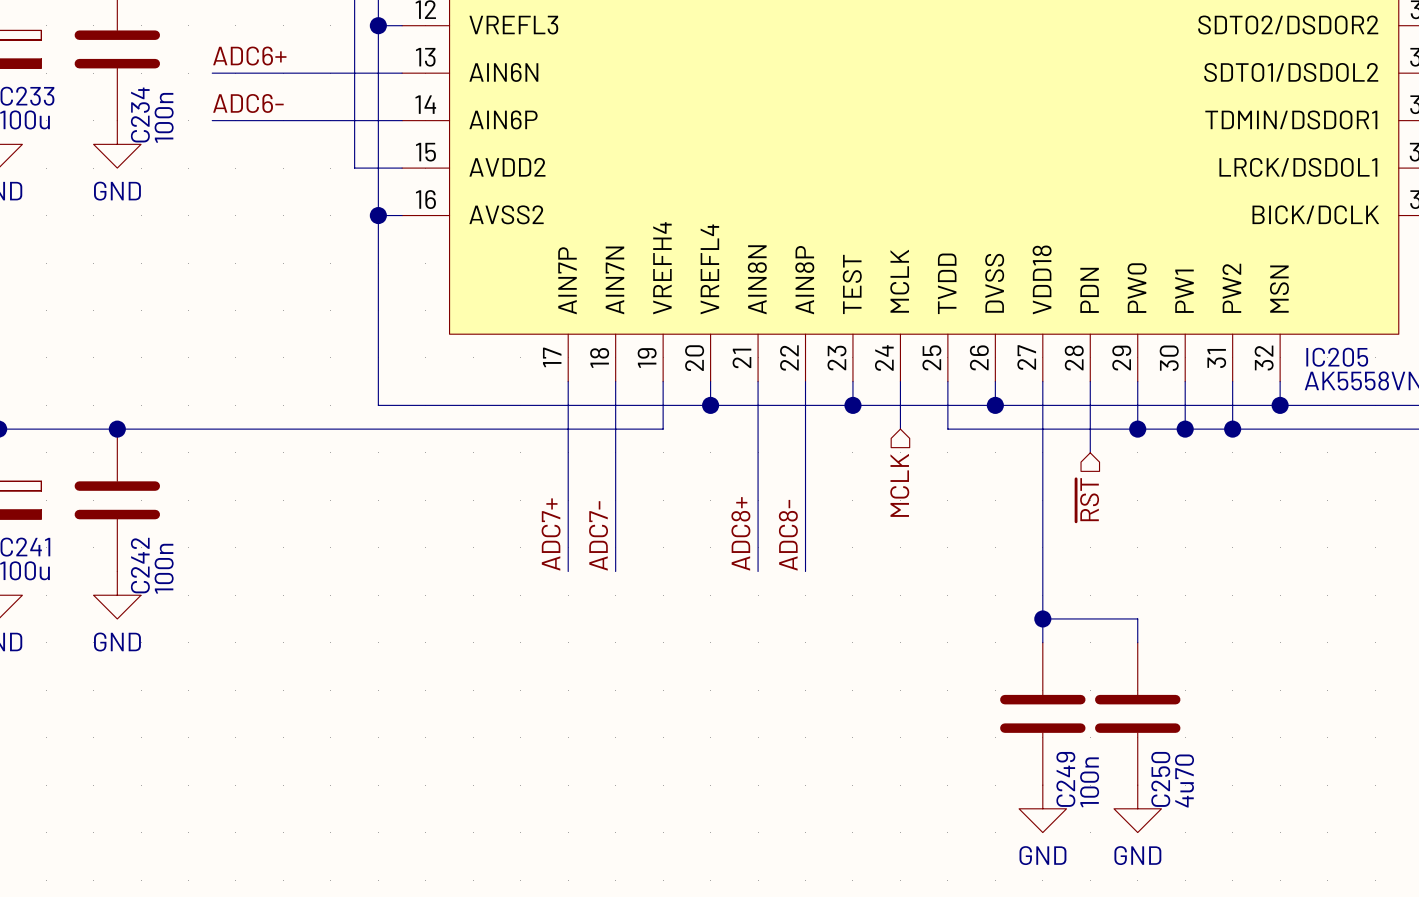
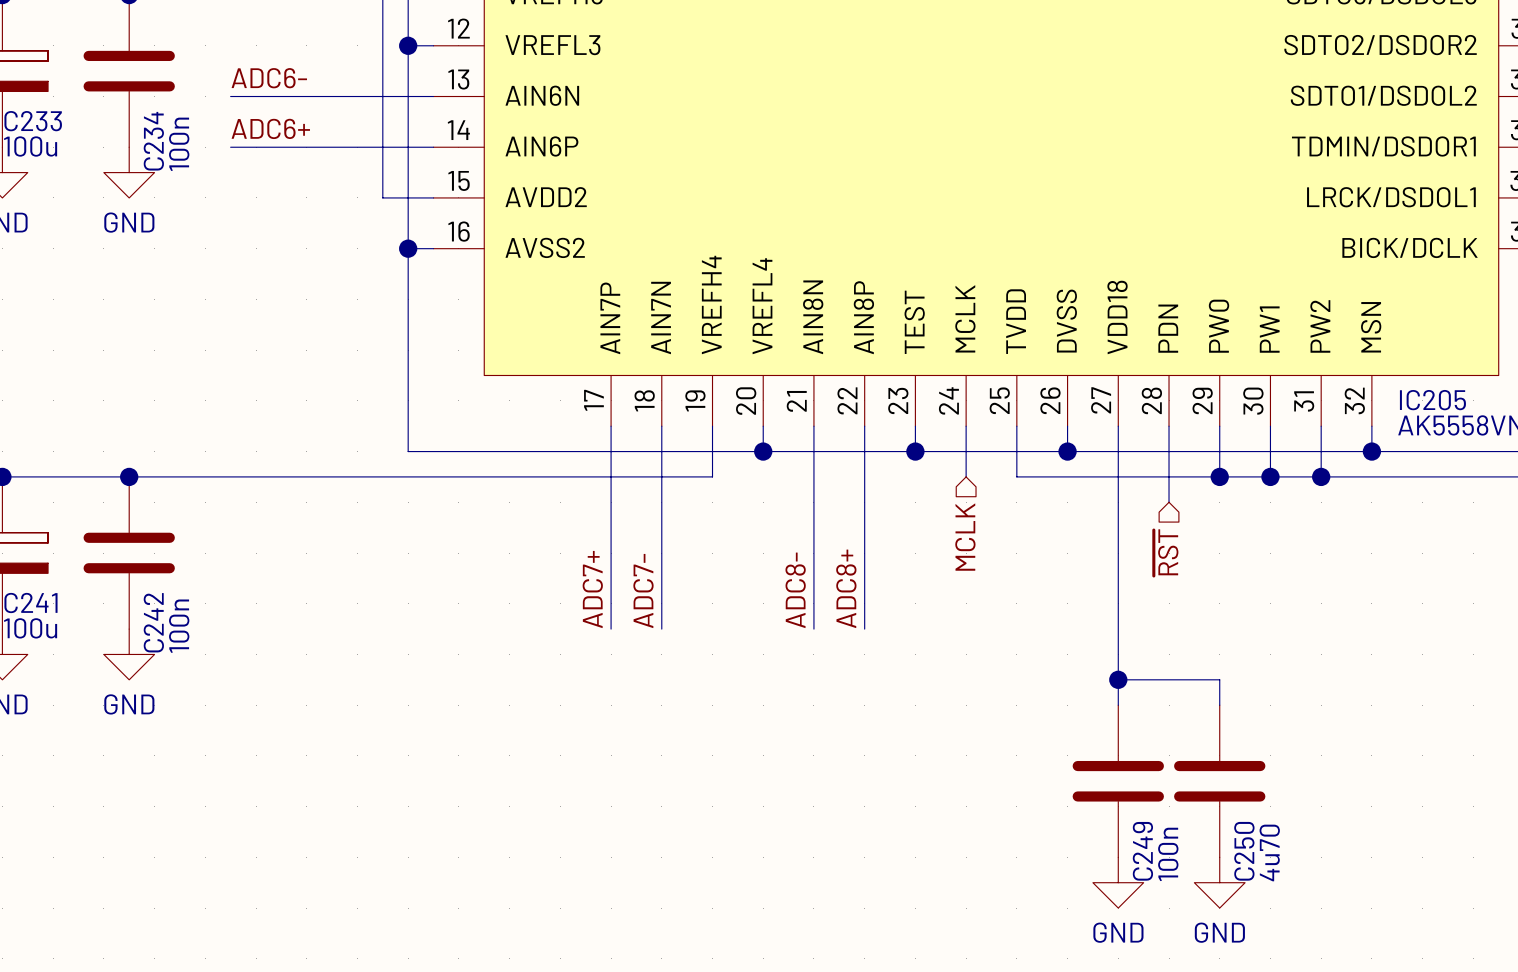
label: ADC6+ (249, 56) -> ADC6- (269, 78)
label: ADC6- (248, 103) -> ADC6+ (270, 128)
label: ADC8+ (740, 533) -> ADC8- (795, 590)
label: ADC8- (788, 535) -> ADC8+ (846, 588)

